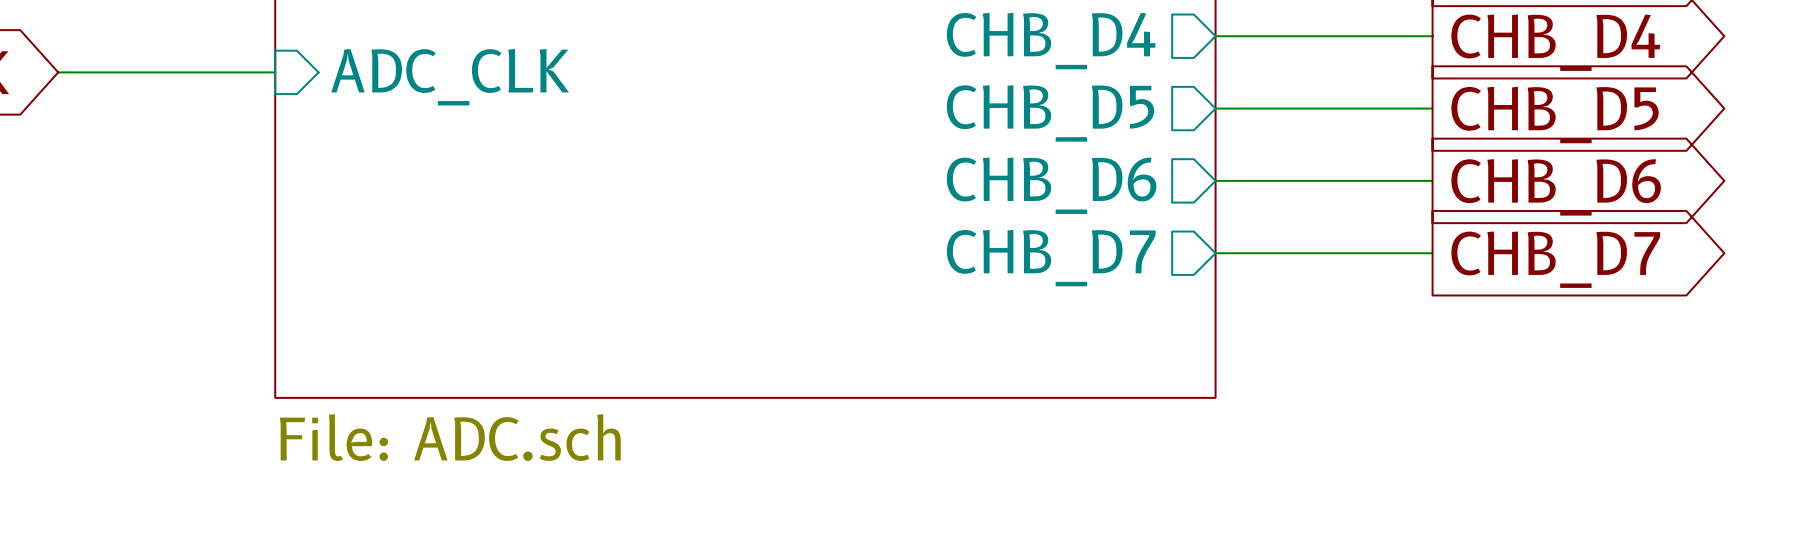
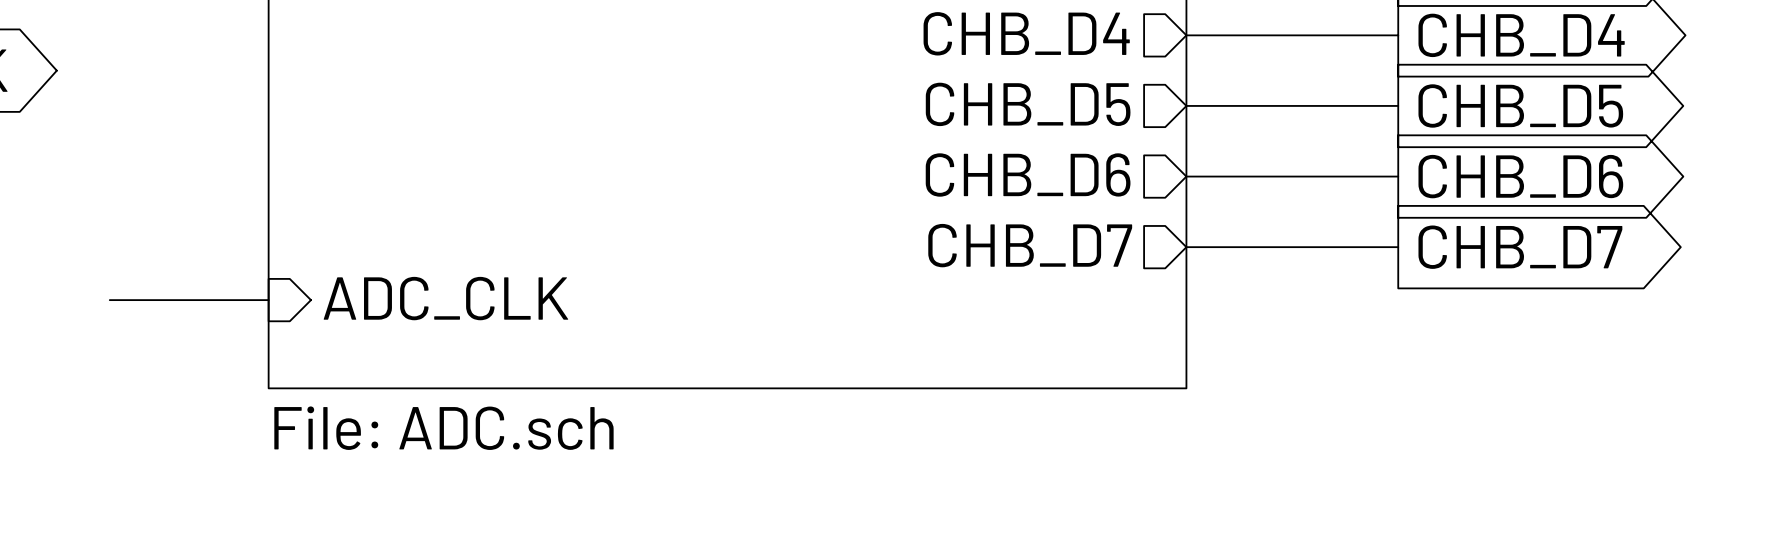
wire: (58, 72) (275, 72) -> none
sheet pin position: ADC_CLK (450, 77) -> ADC_CLK (445, 298)
wire: none -> (109, 300) (268, 300)

